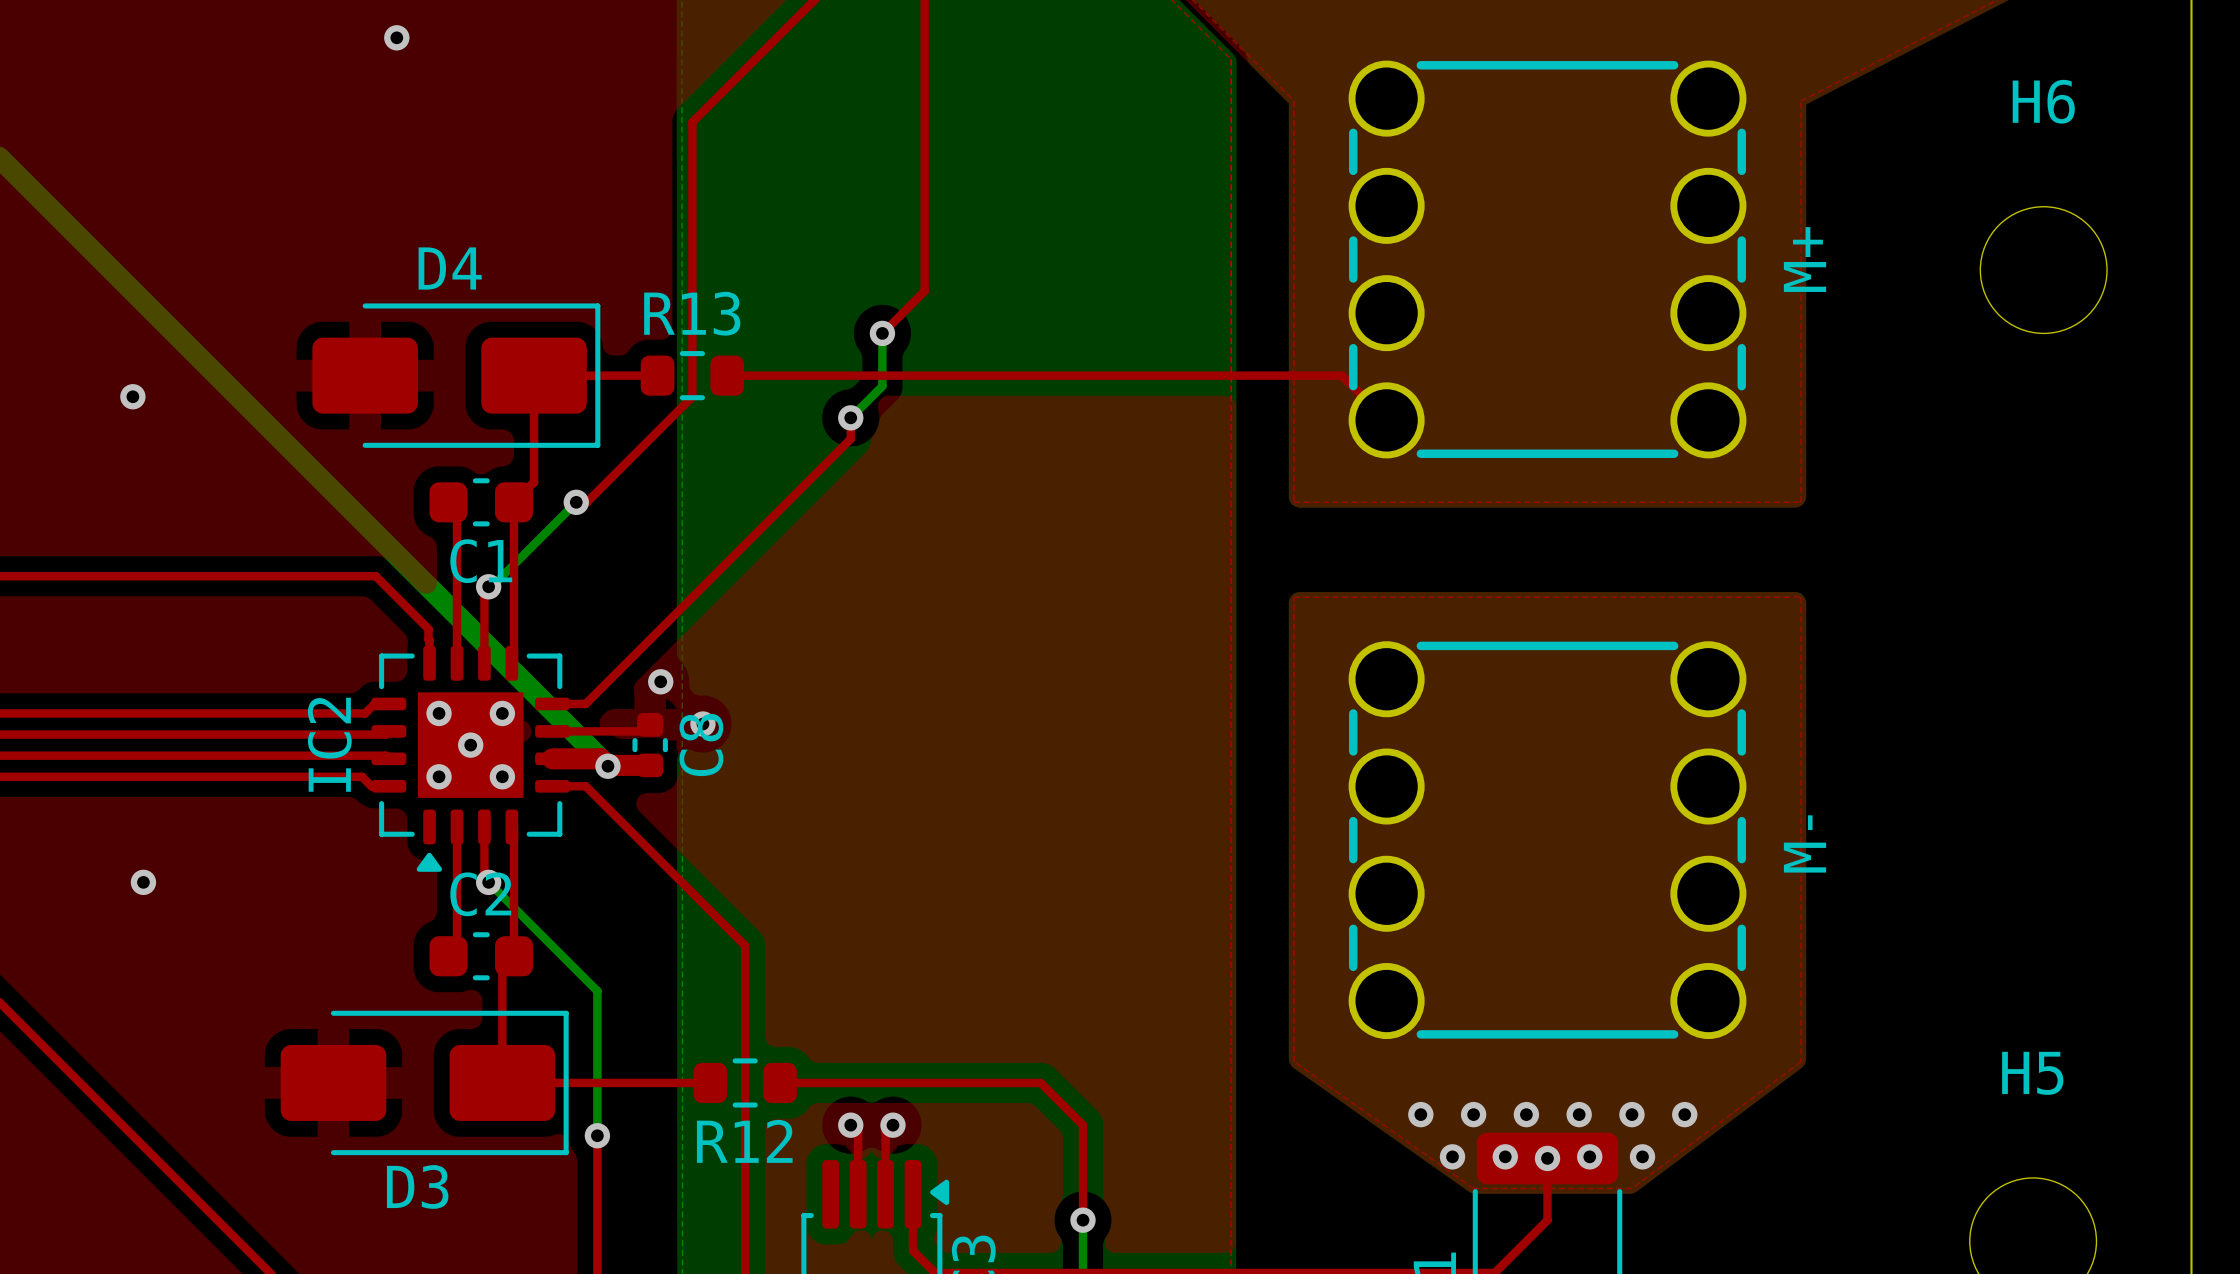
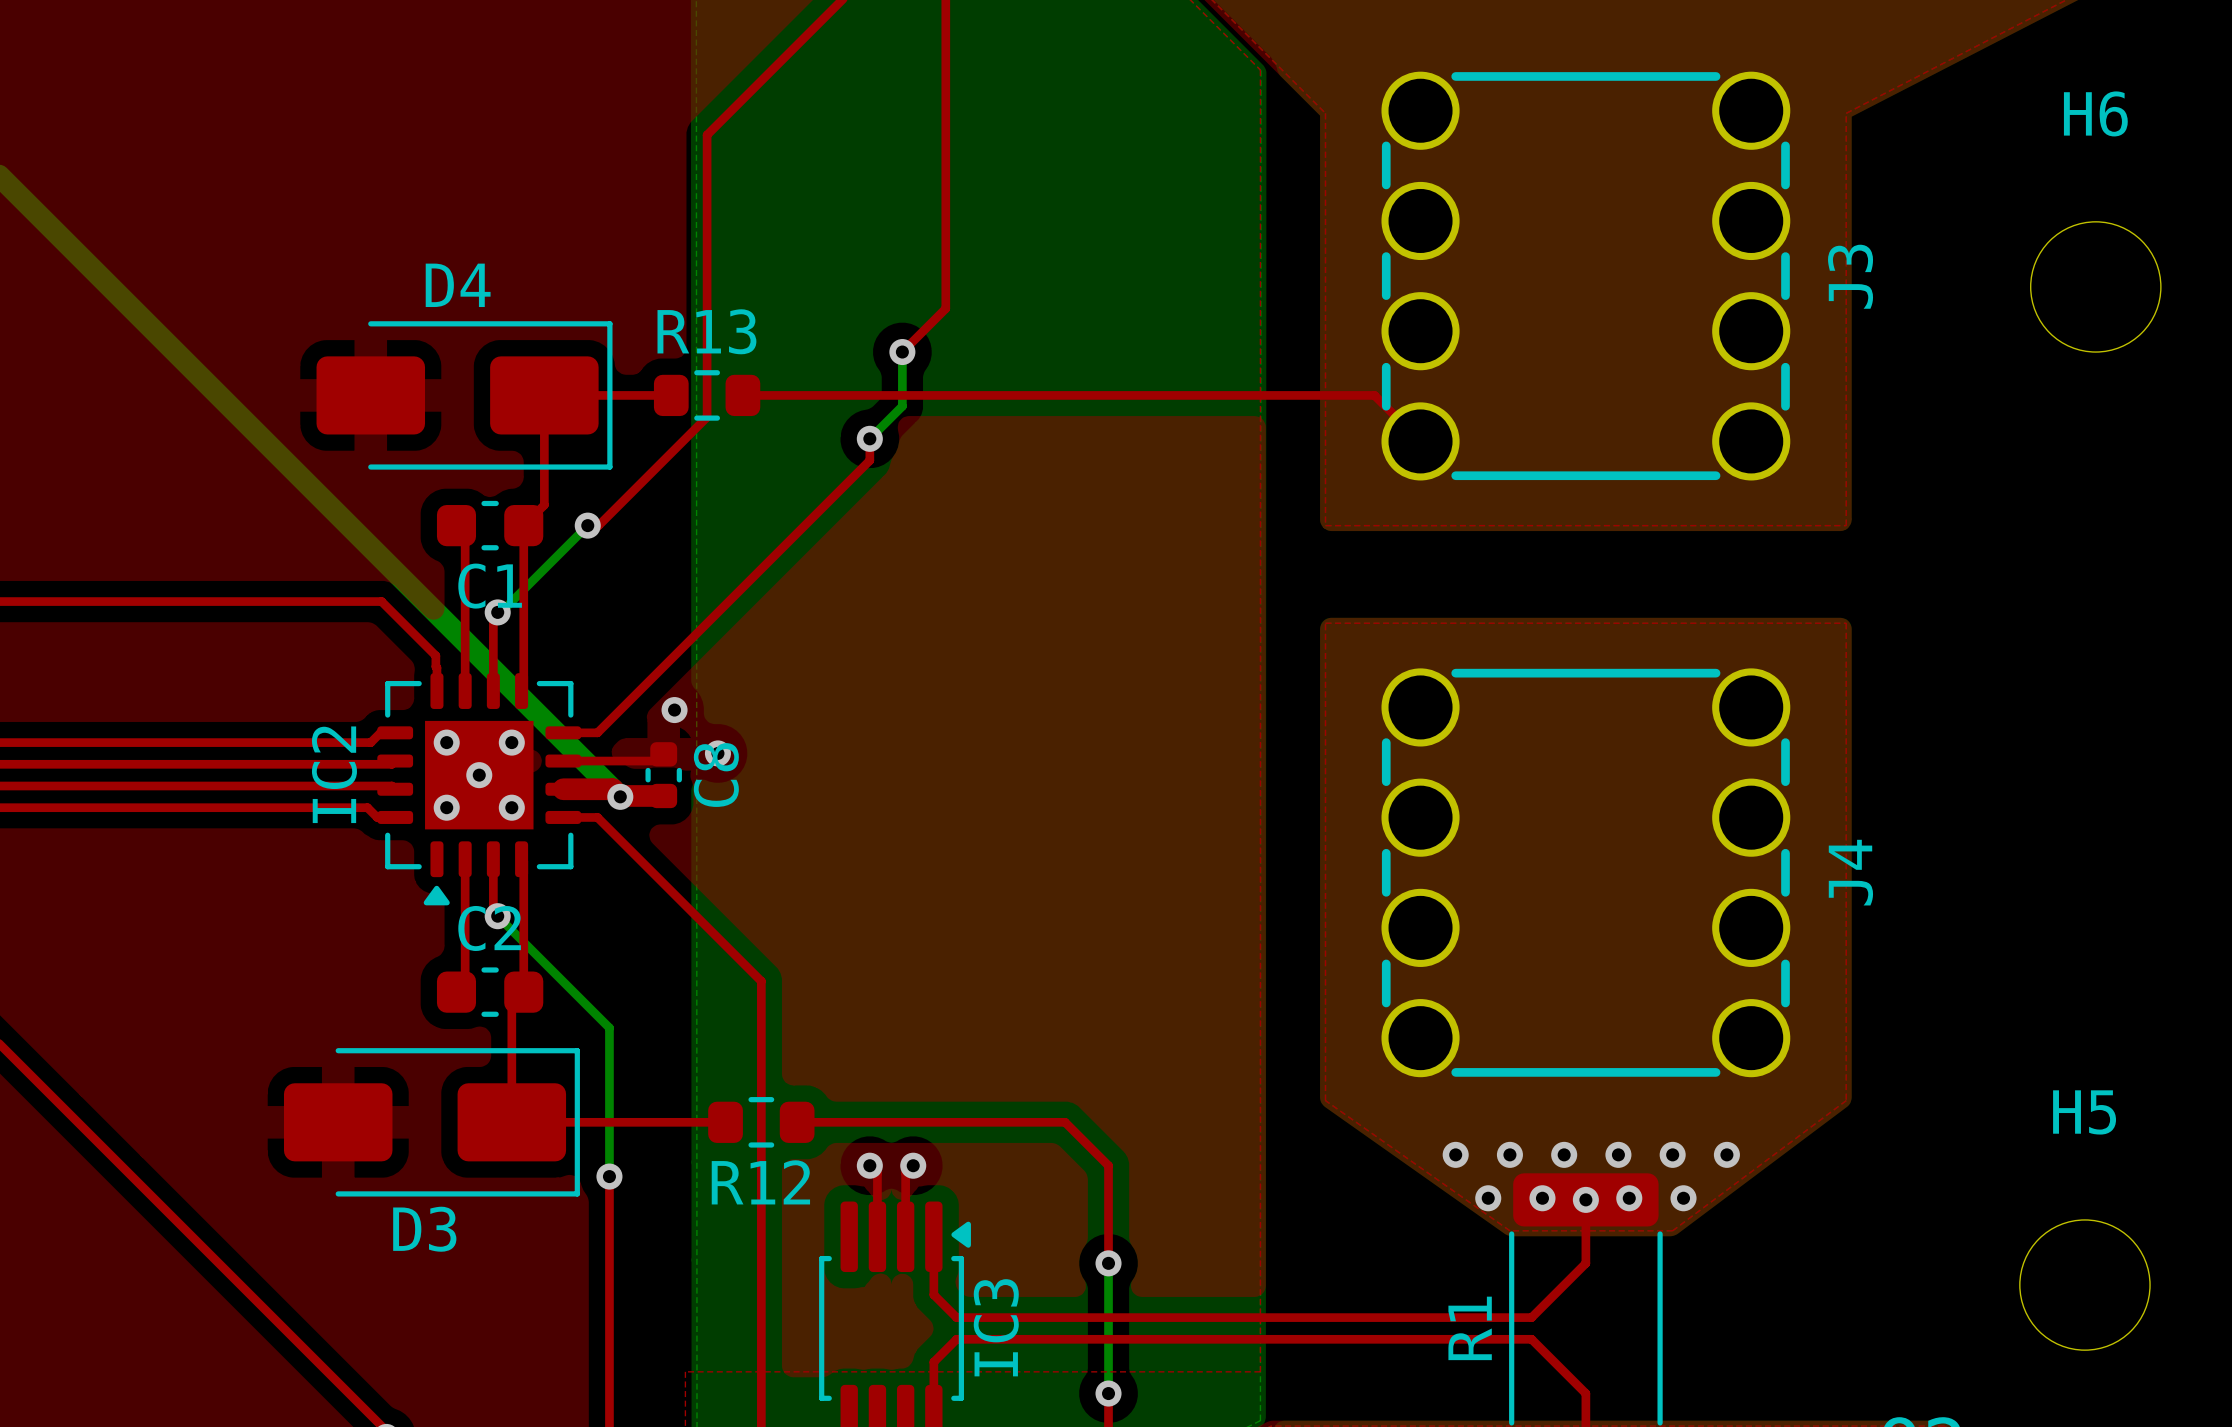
via: (396, 37) -> none
M+ name: M+ (1805, 259) -> J3 (1850, 276)
via: (132, 396) -> none
M- name: M- (1805, 843) -> J4 (1850, 872)
via: (143, 882) -> none

